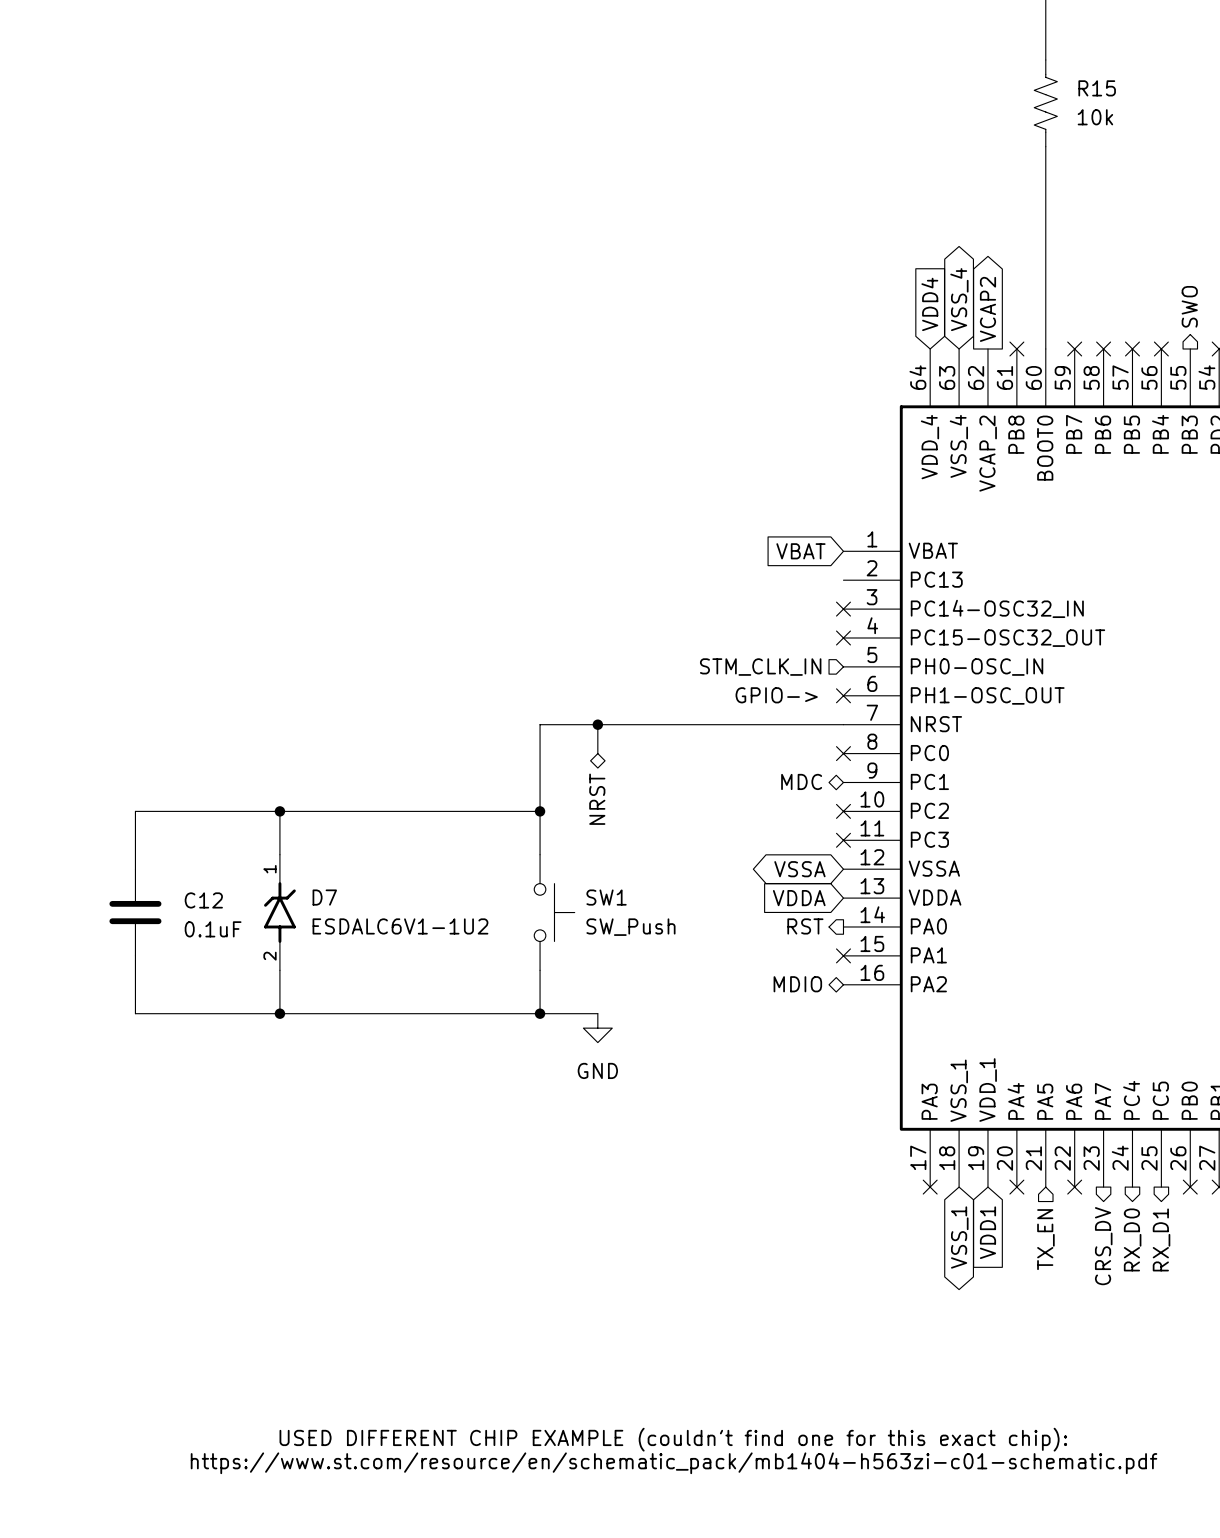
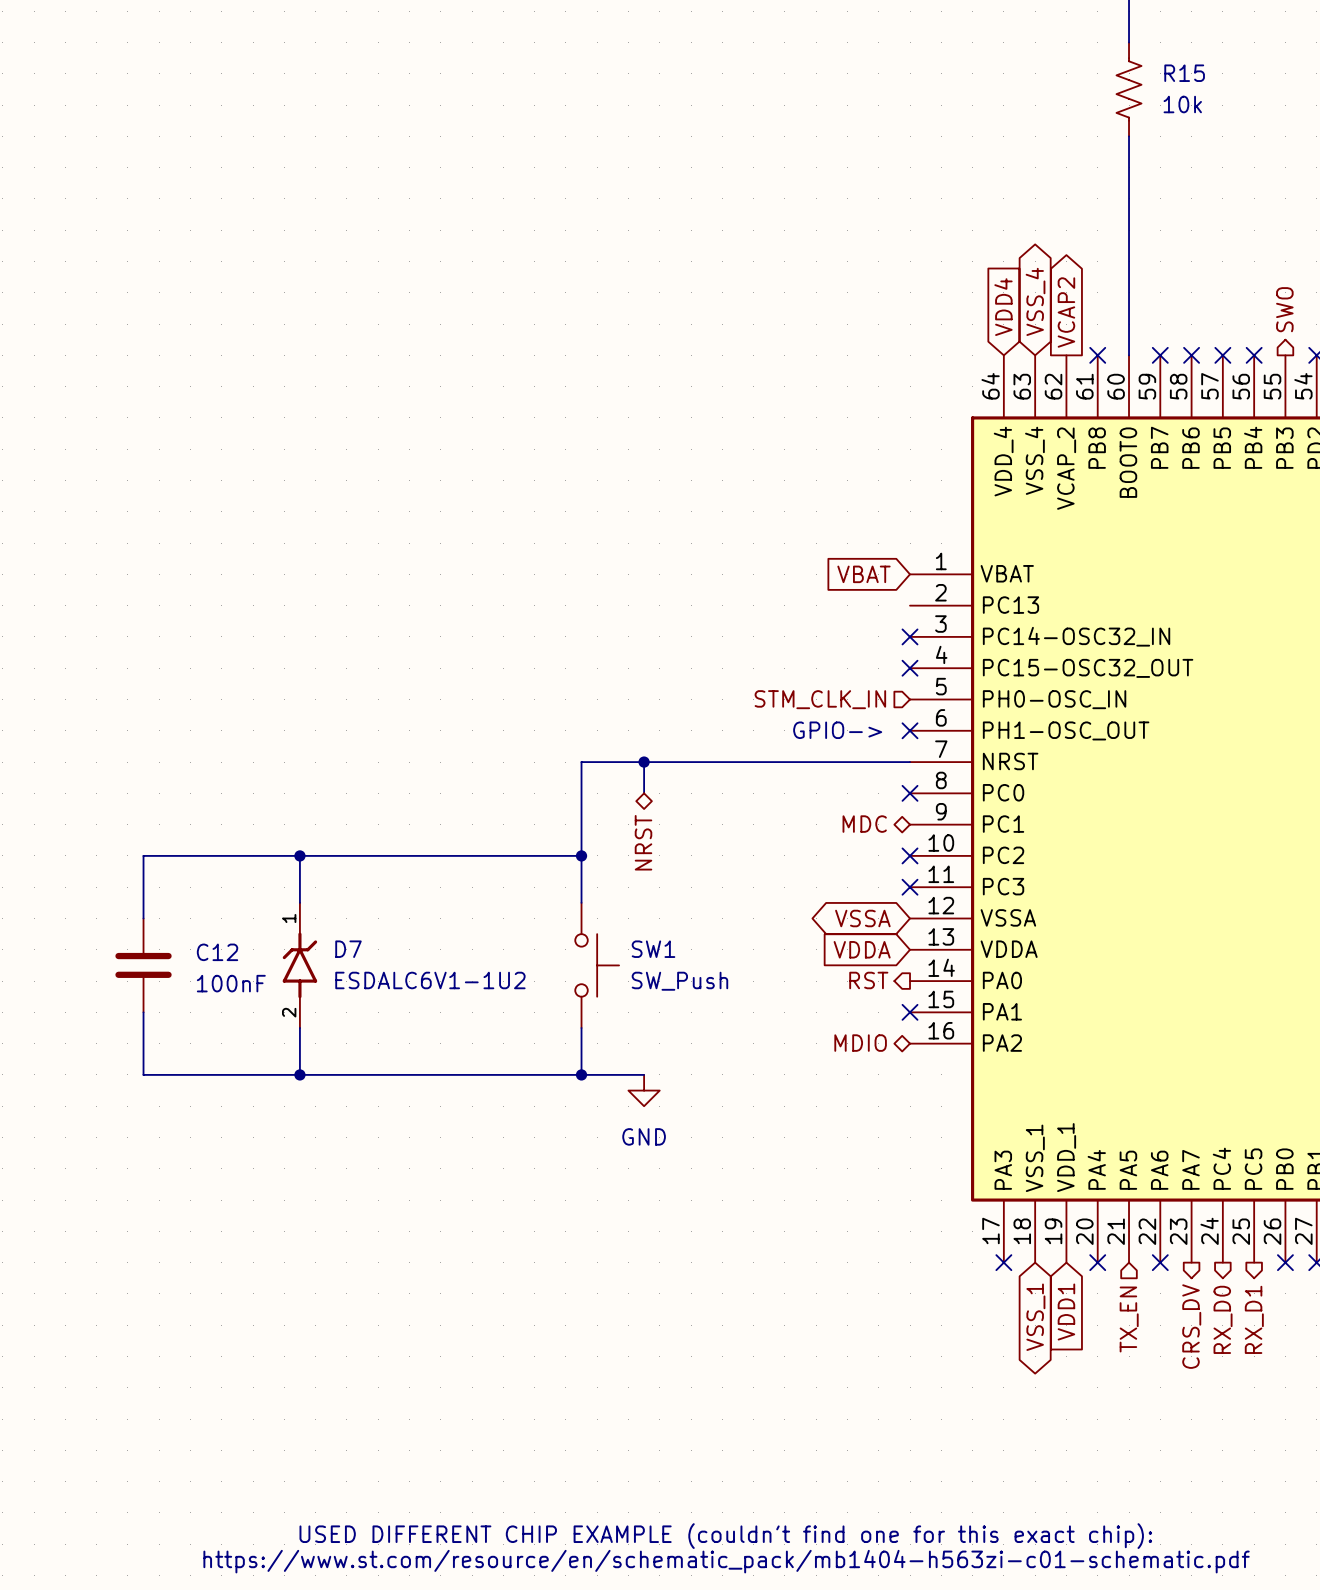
C12 value: 0.1uF (213, 929) -> 100nF (231, 983)

